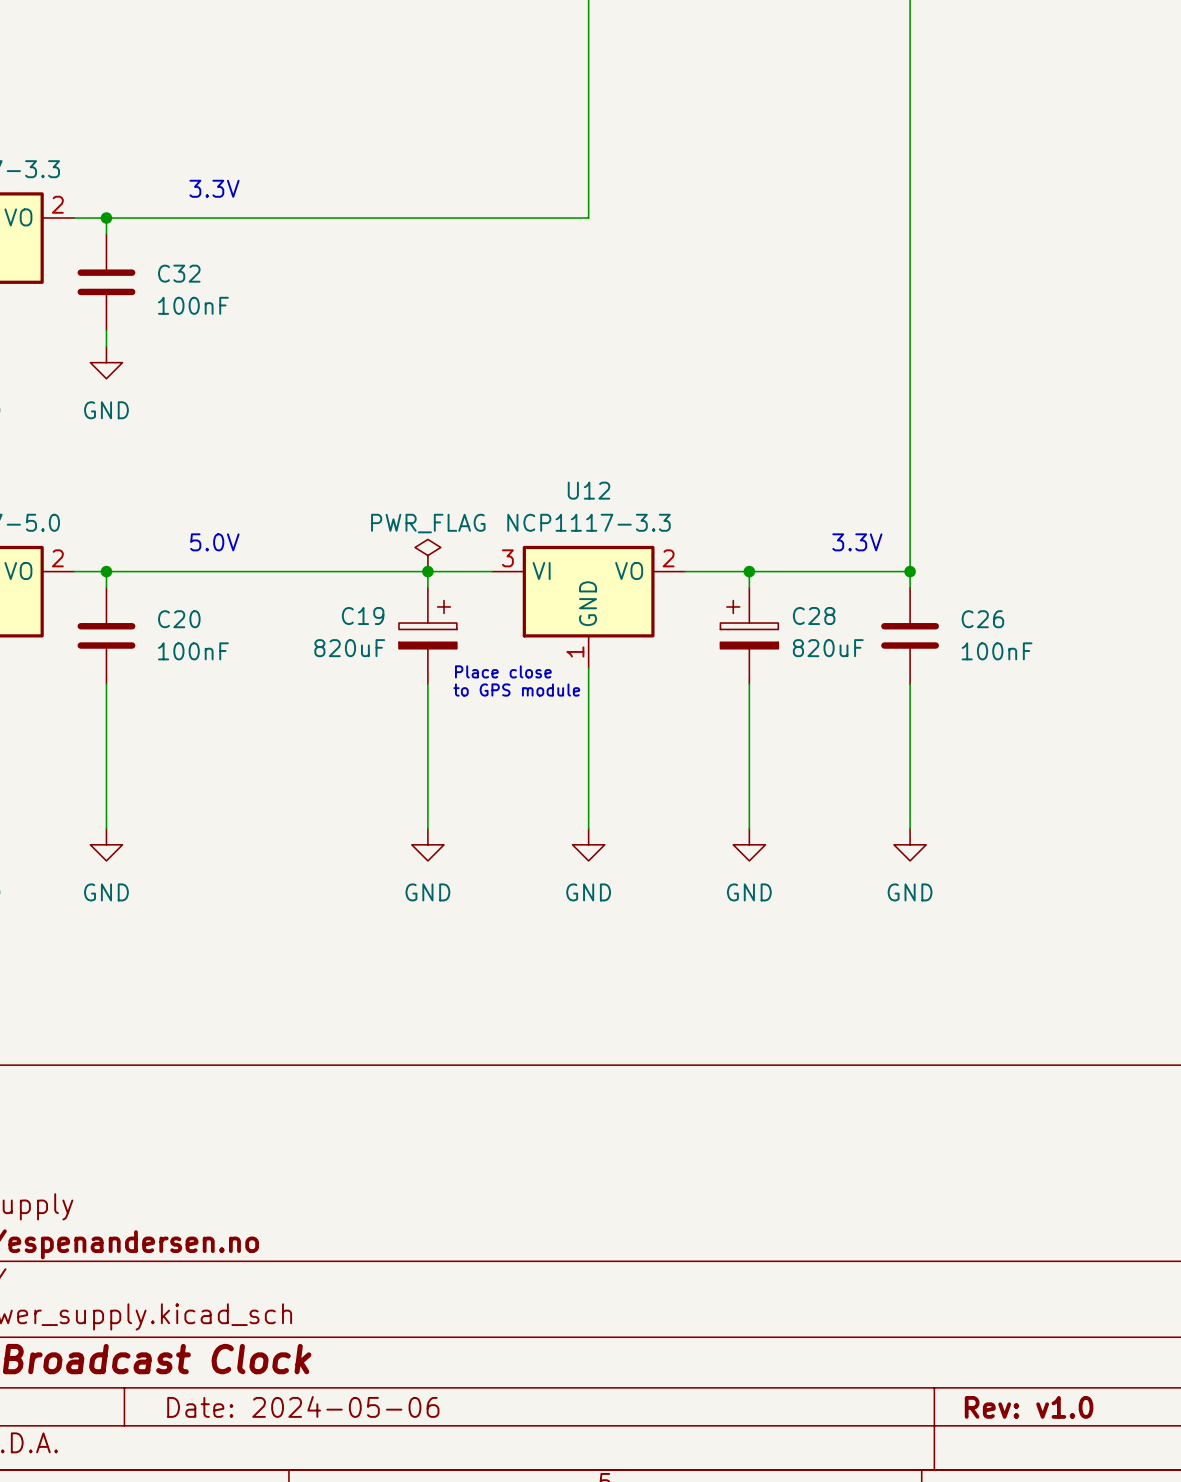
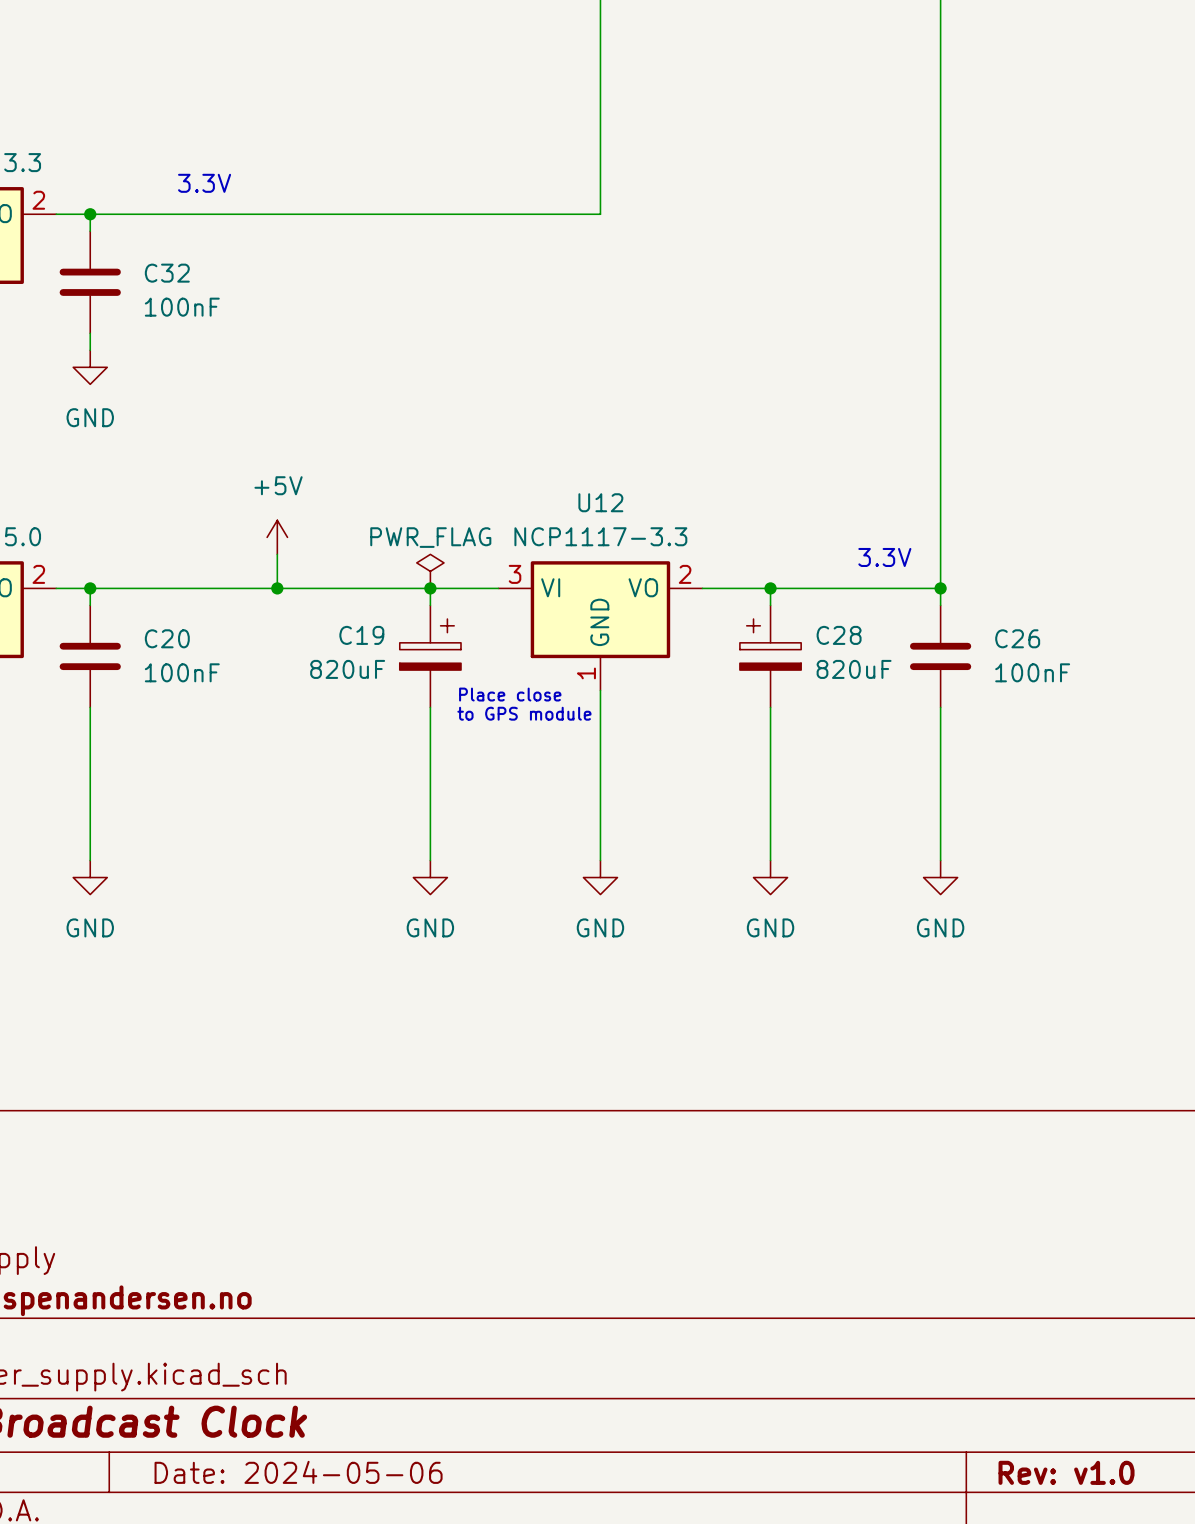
power symbol: none -> +5V (277, 537)
wire: none -> (277, 554) (277, 588)
text: 5.0V (214, 542) -> none
junction: none -> (277, 588)

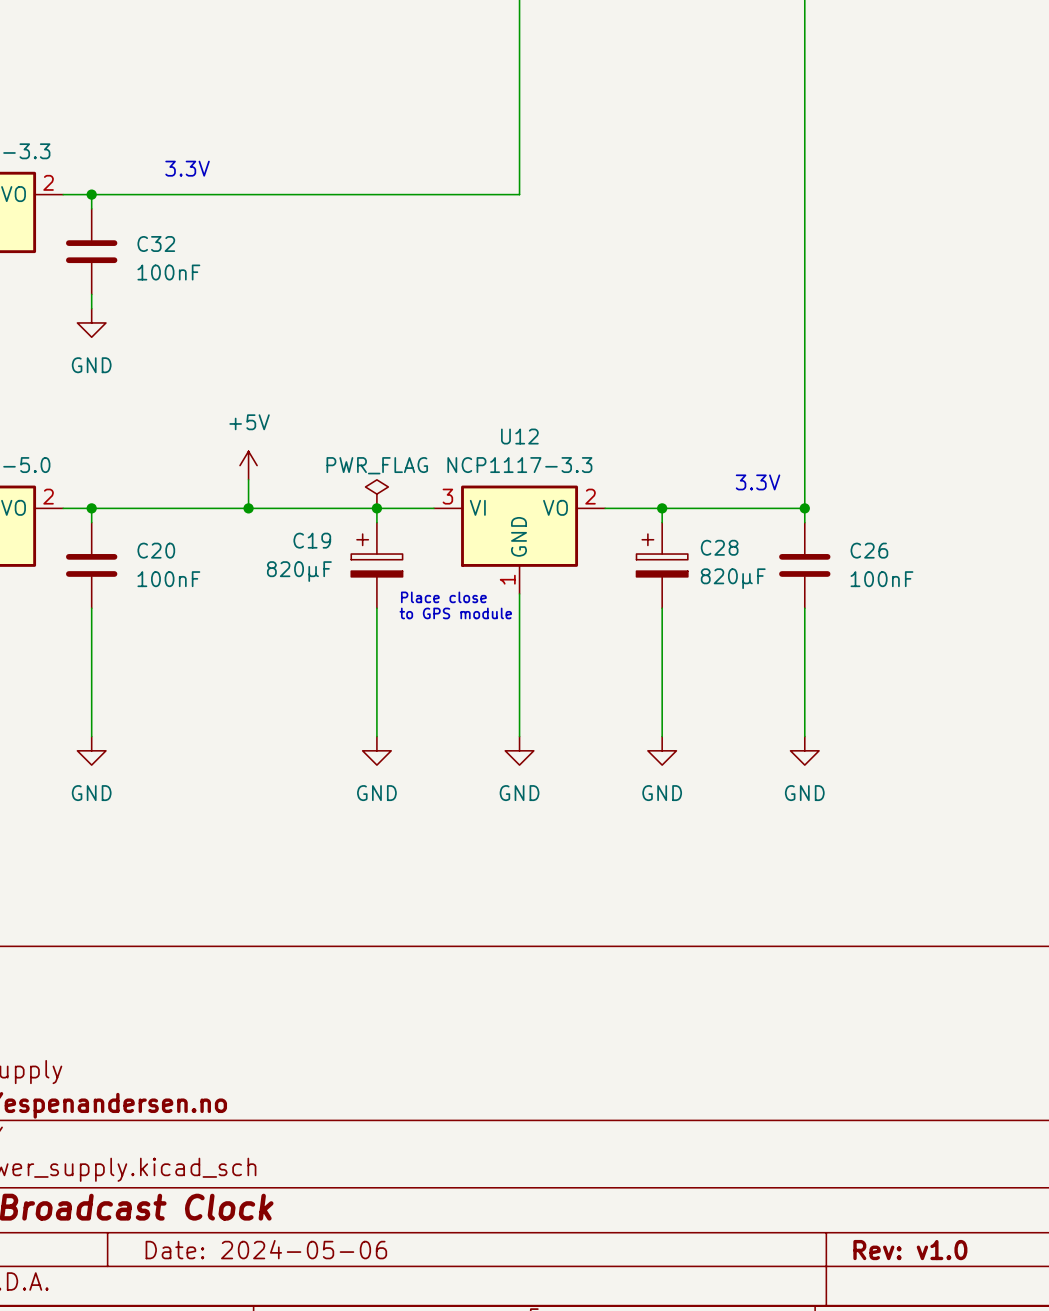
C19 flip: as is (430, 644) -> left-right (376, 555)
C19 value: 820uF (347, 669) -> 820μF (299, 571)
C28 value: 820uF (854, 669) -> 820μF (733, 578)

